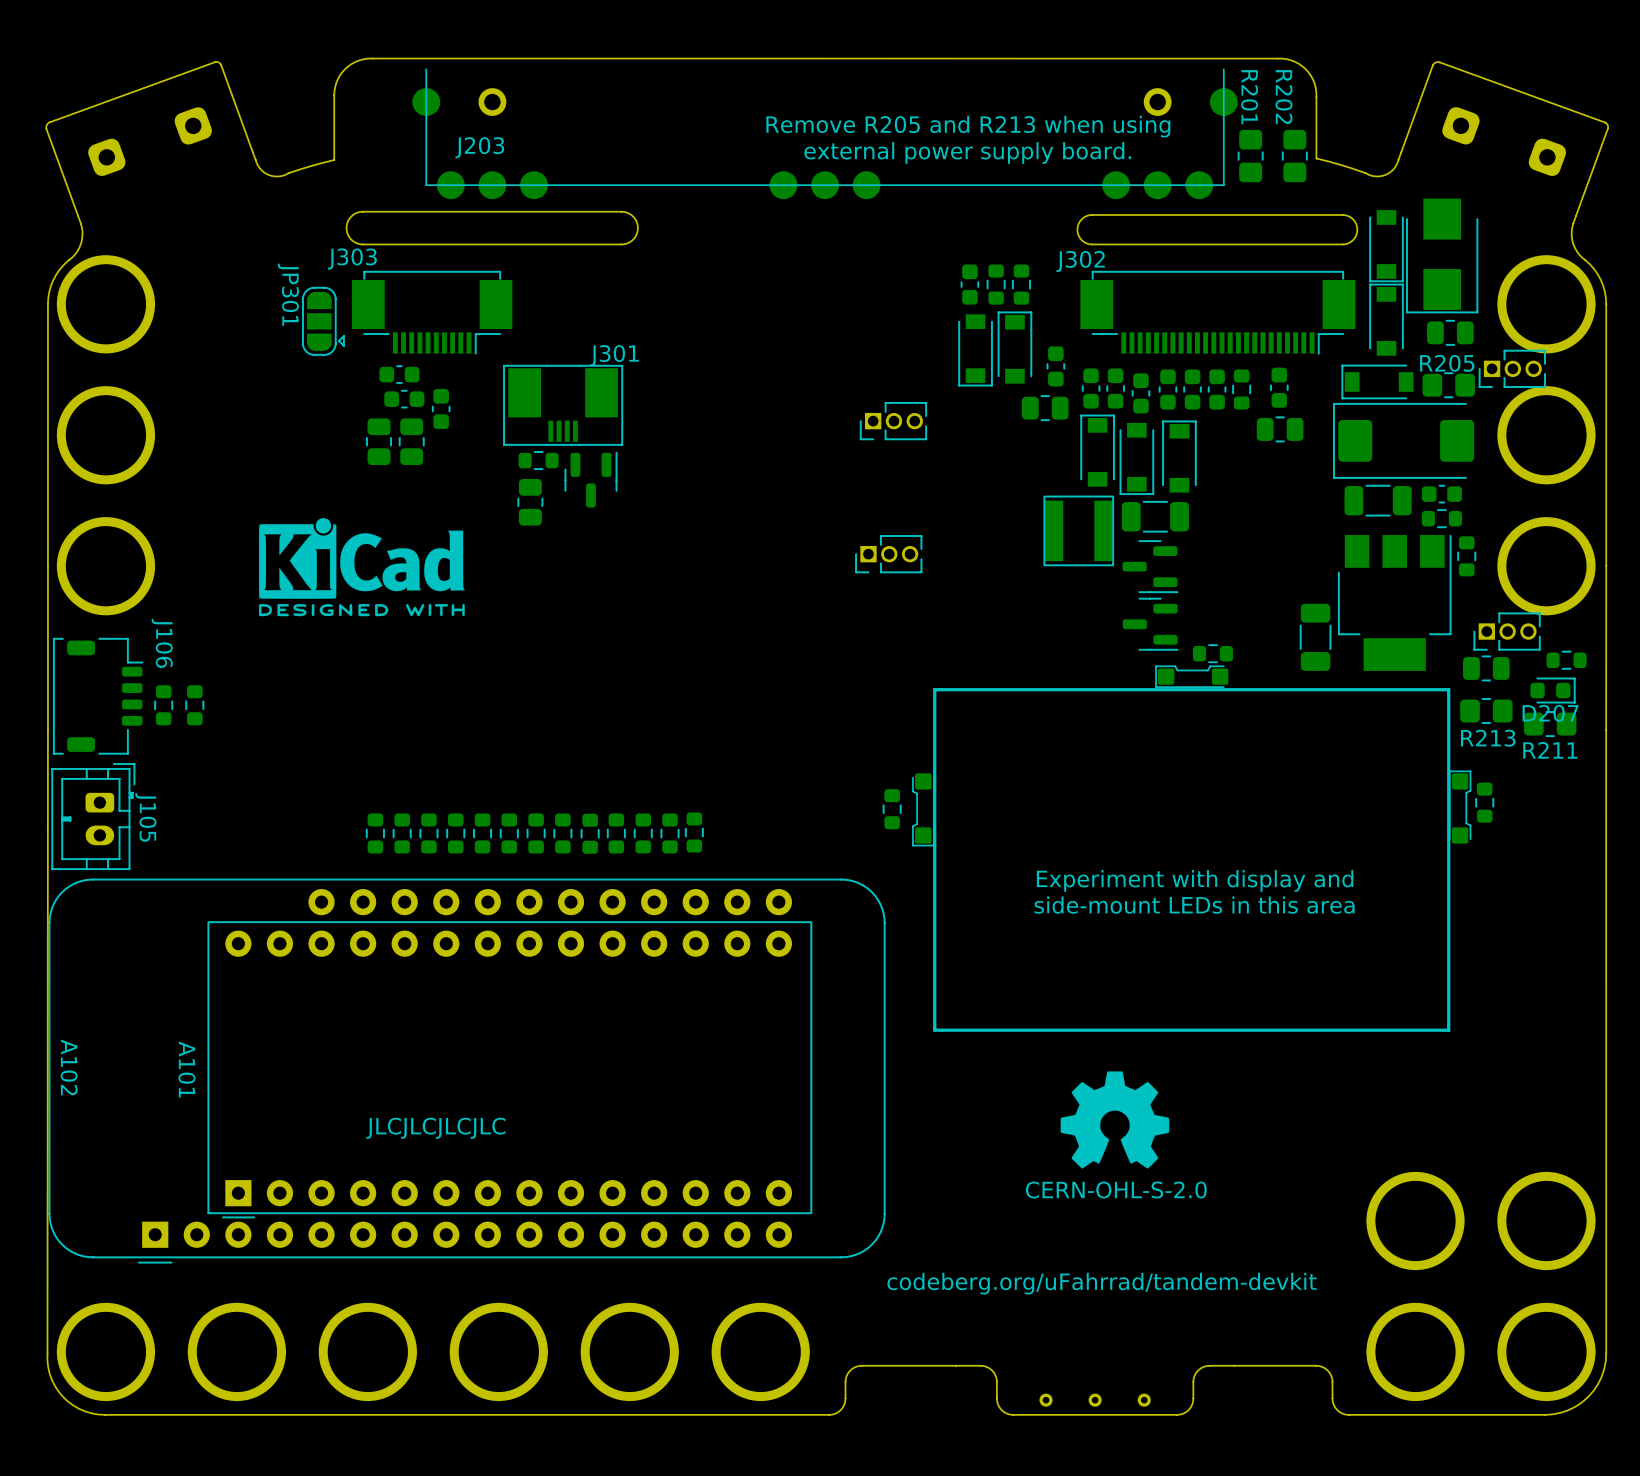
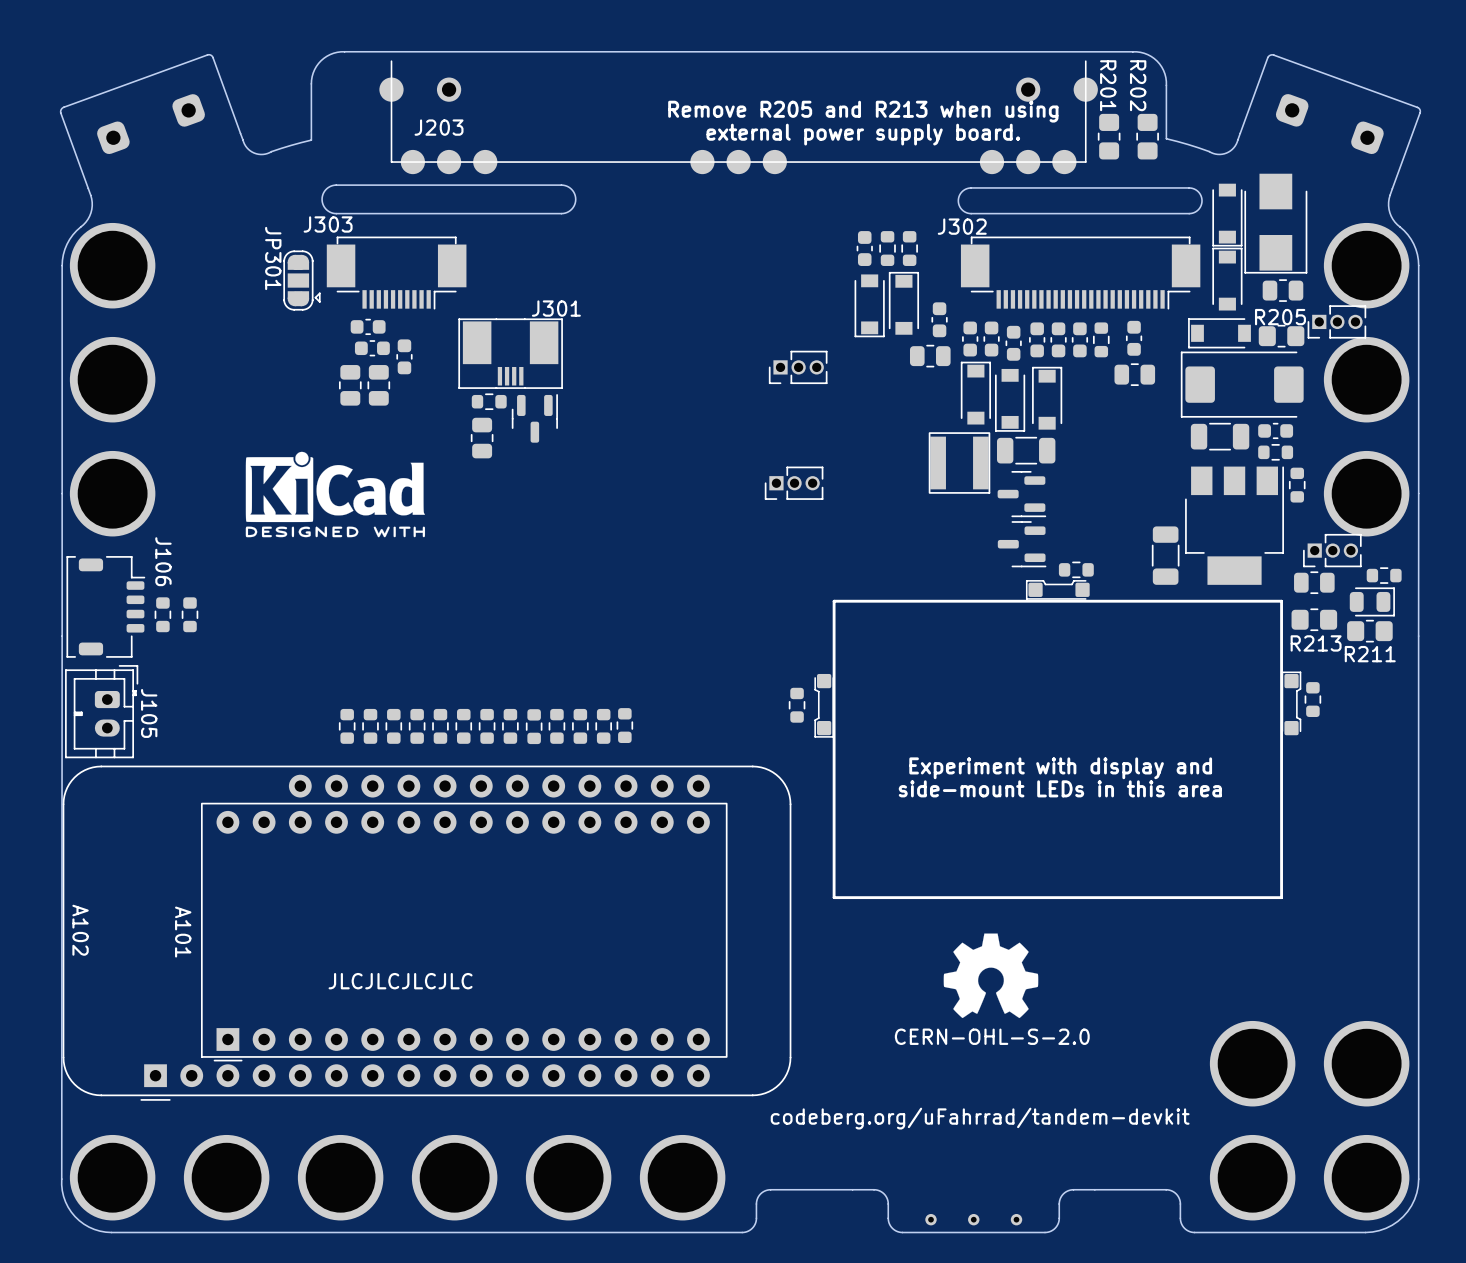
D207: (1553, 690) -> none
part: none -> (1372, 601)

